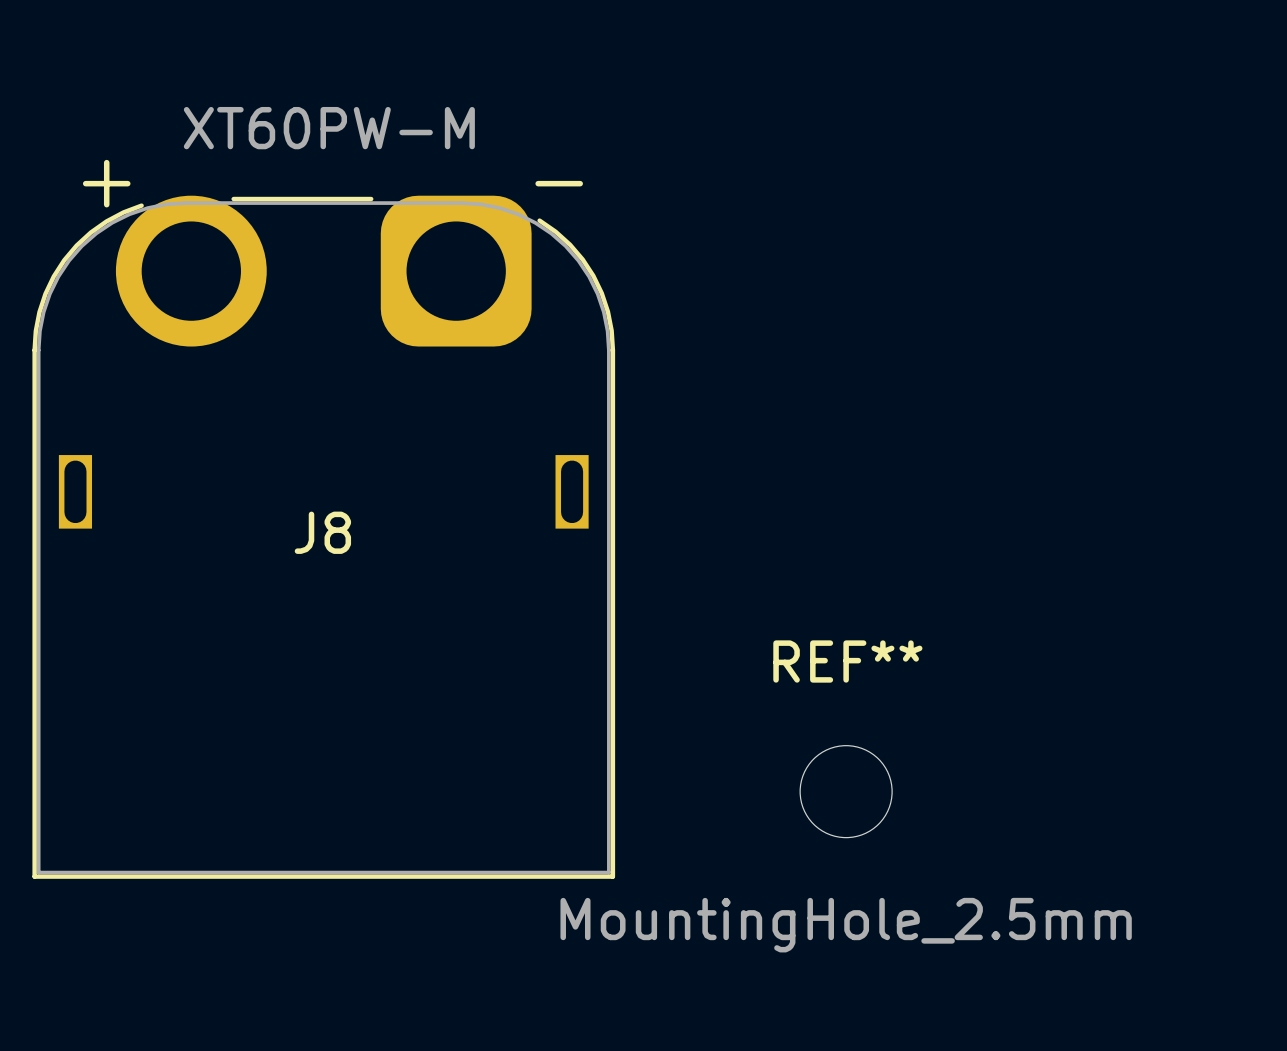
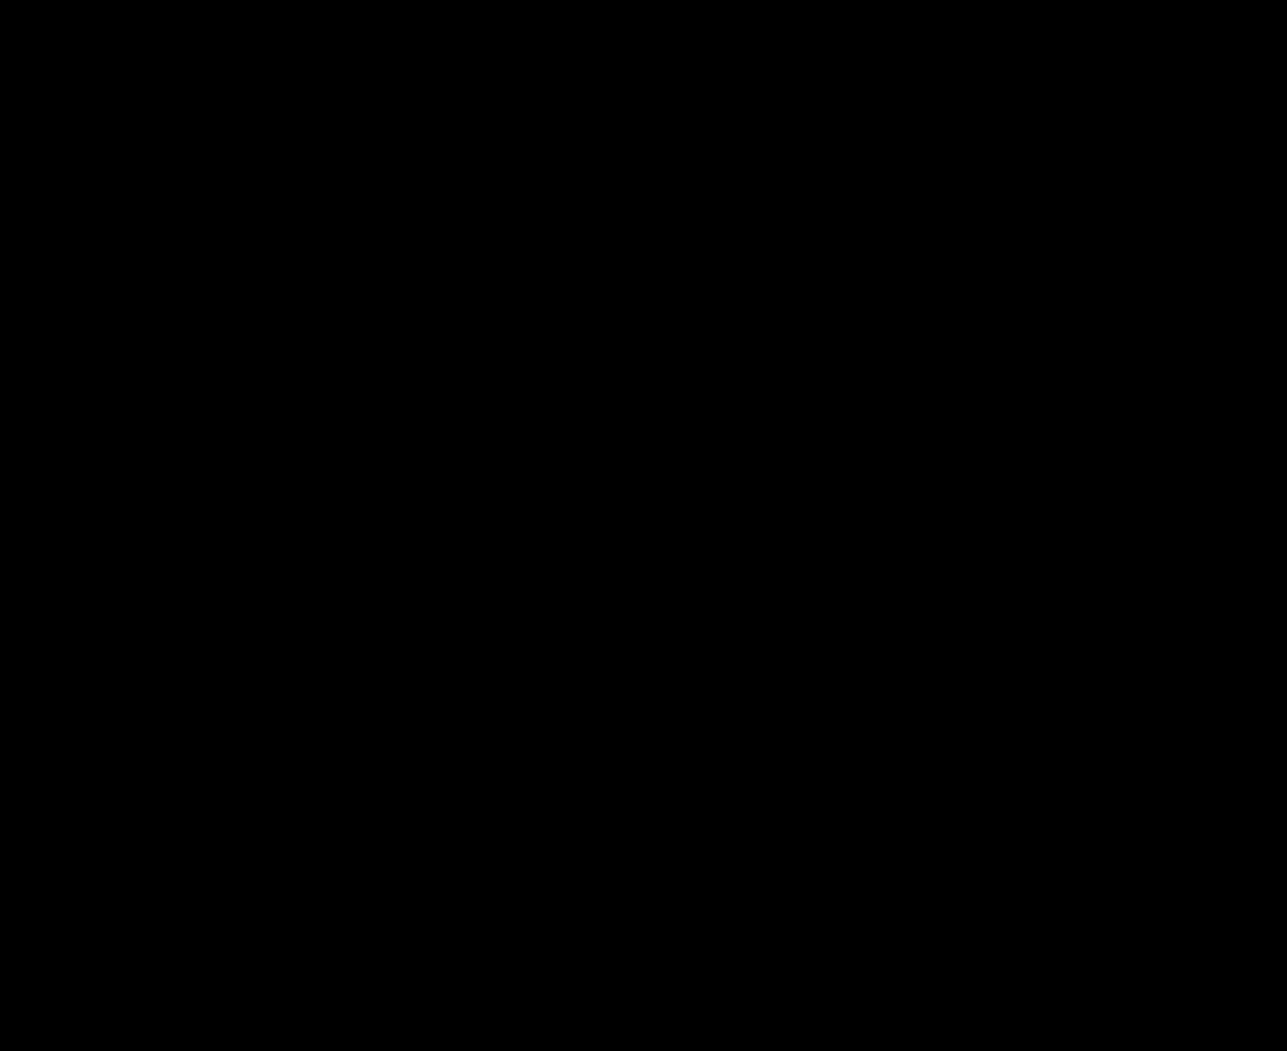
J8: XT60PW-M (323, 537) -> none
REF**: MountingHole_2.5mm (846, 791) -> none

